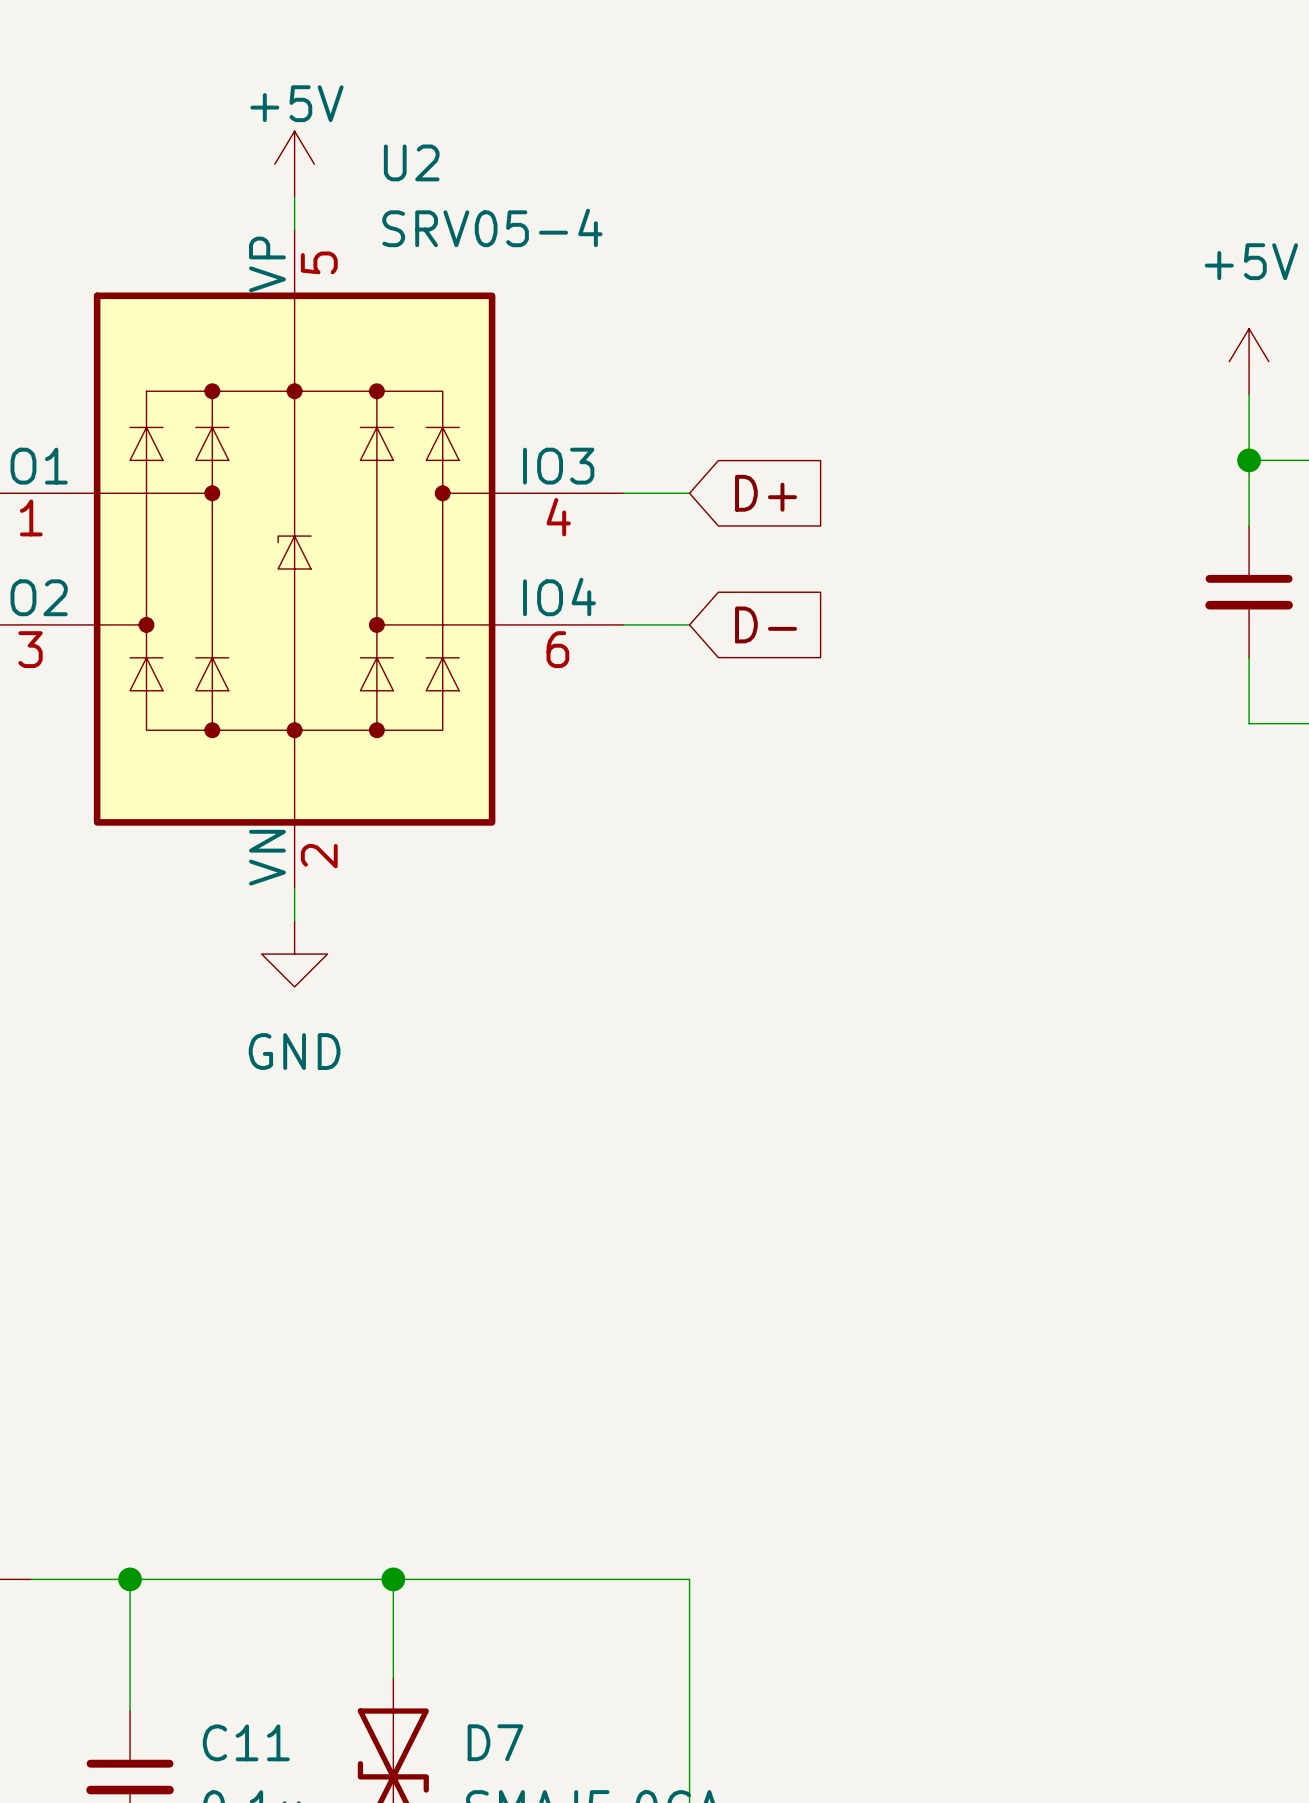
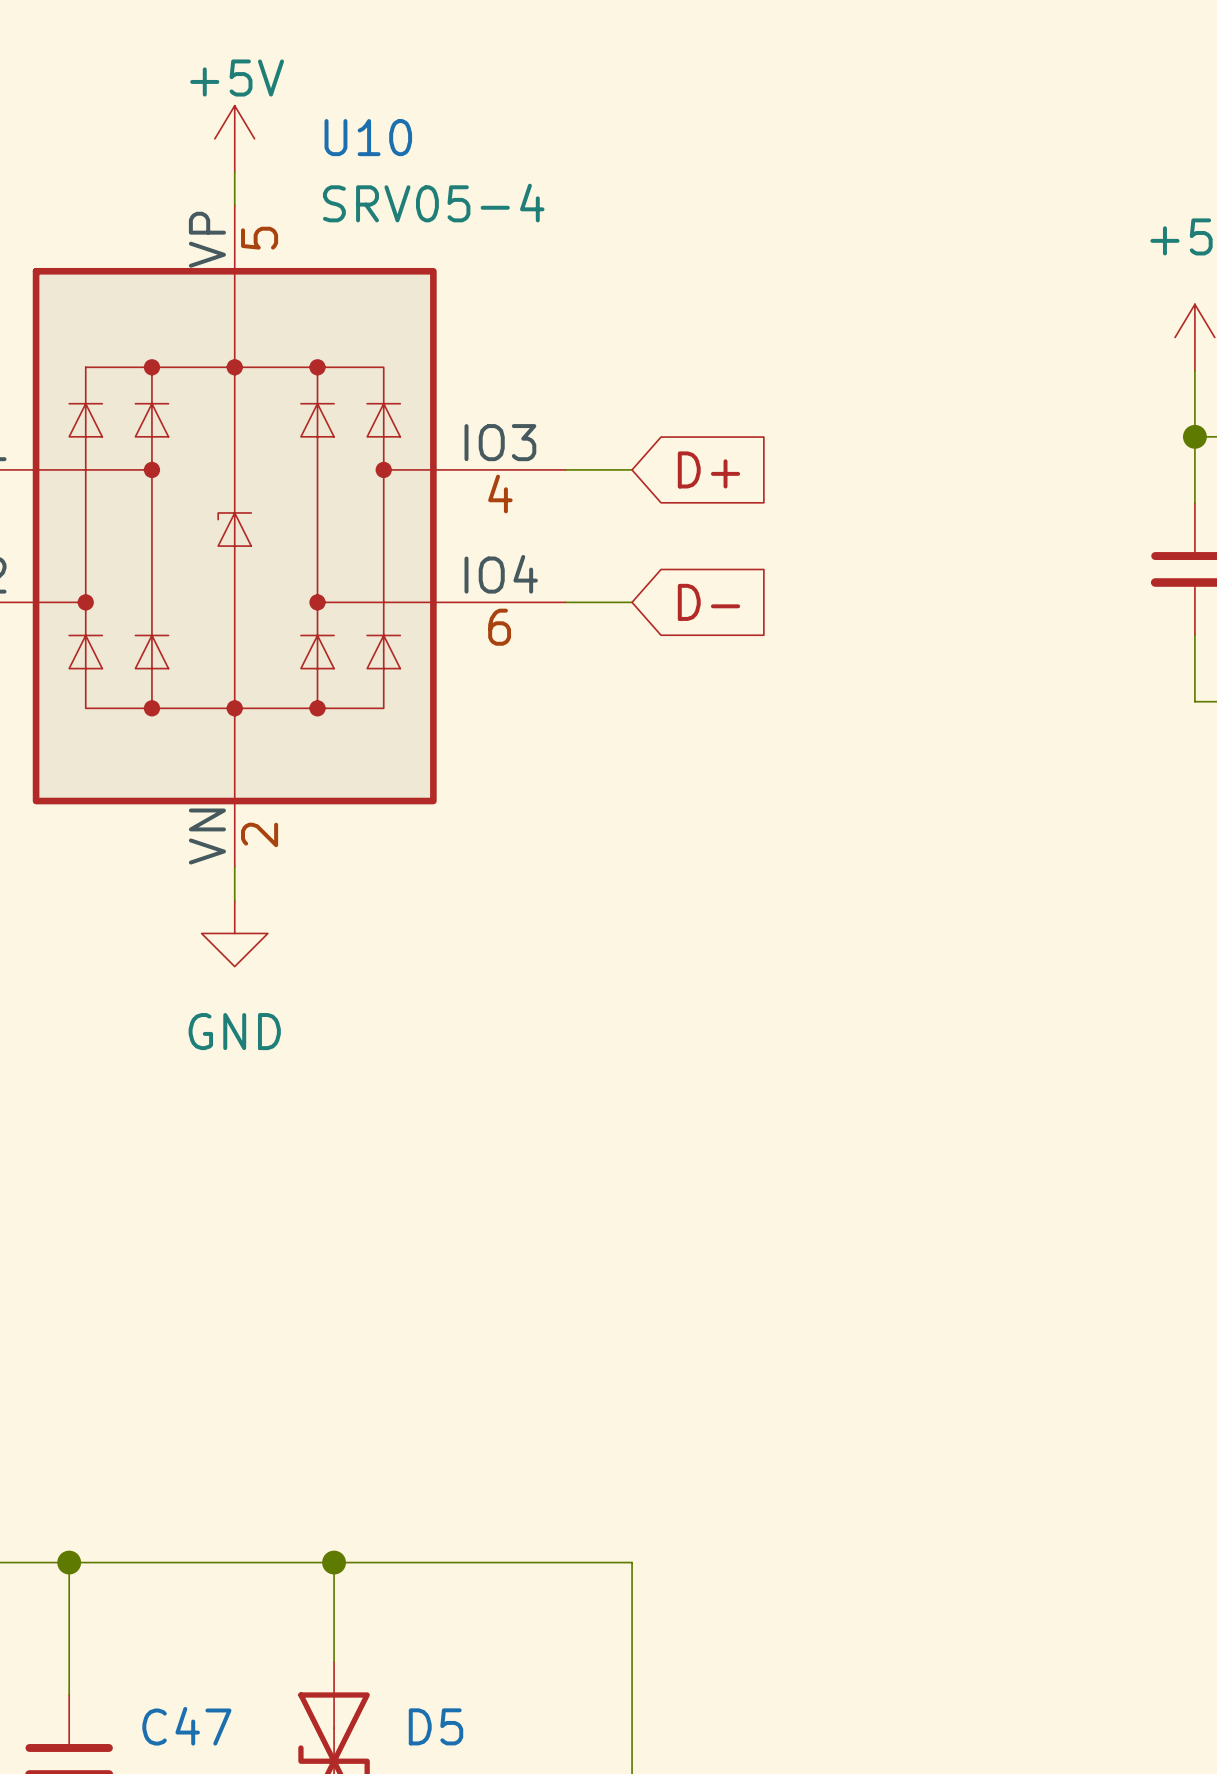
U2 name: U2 (411, 162) -> U10 (368, 137)
C11 name: C11 (246, 1742) -> C47 (186, 1726)
D7 name: D7 (495, 1742) -> D5 (436, 1726)

